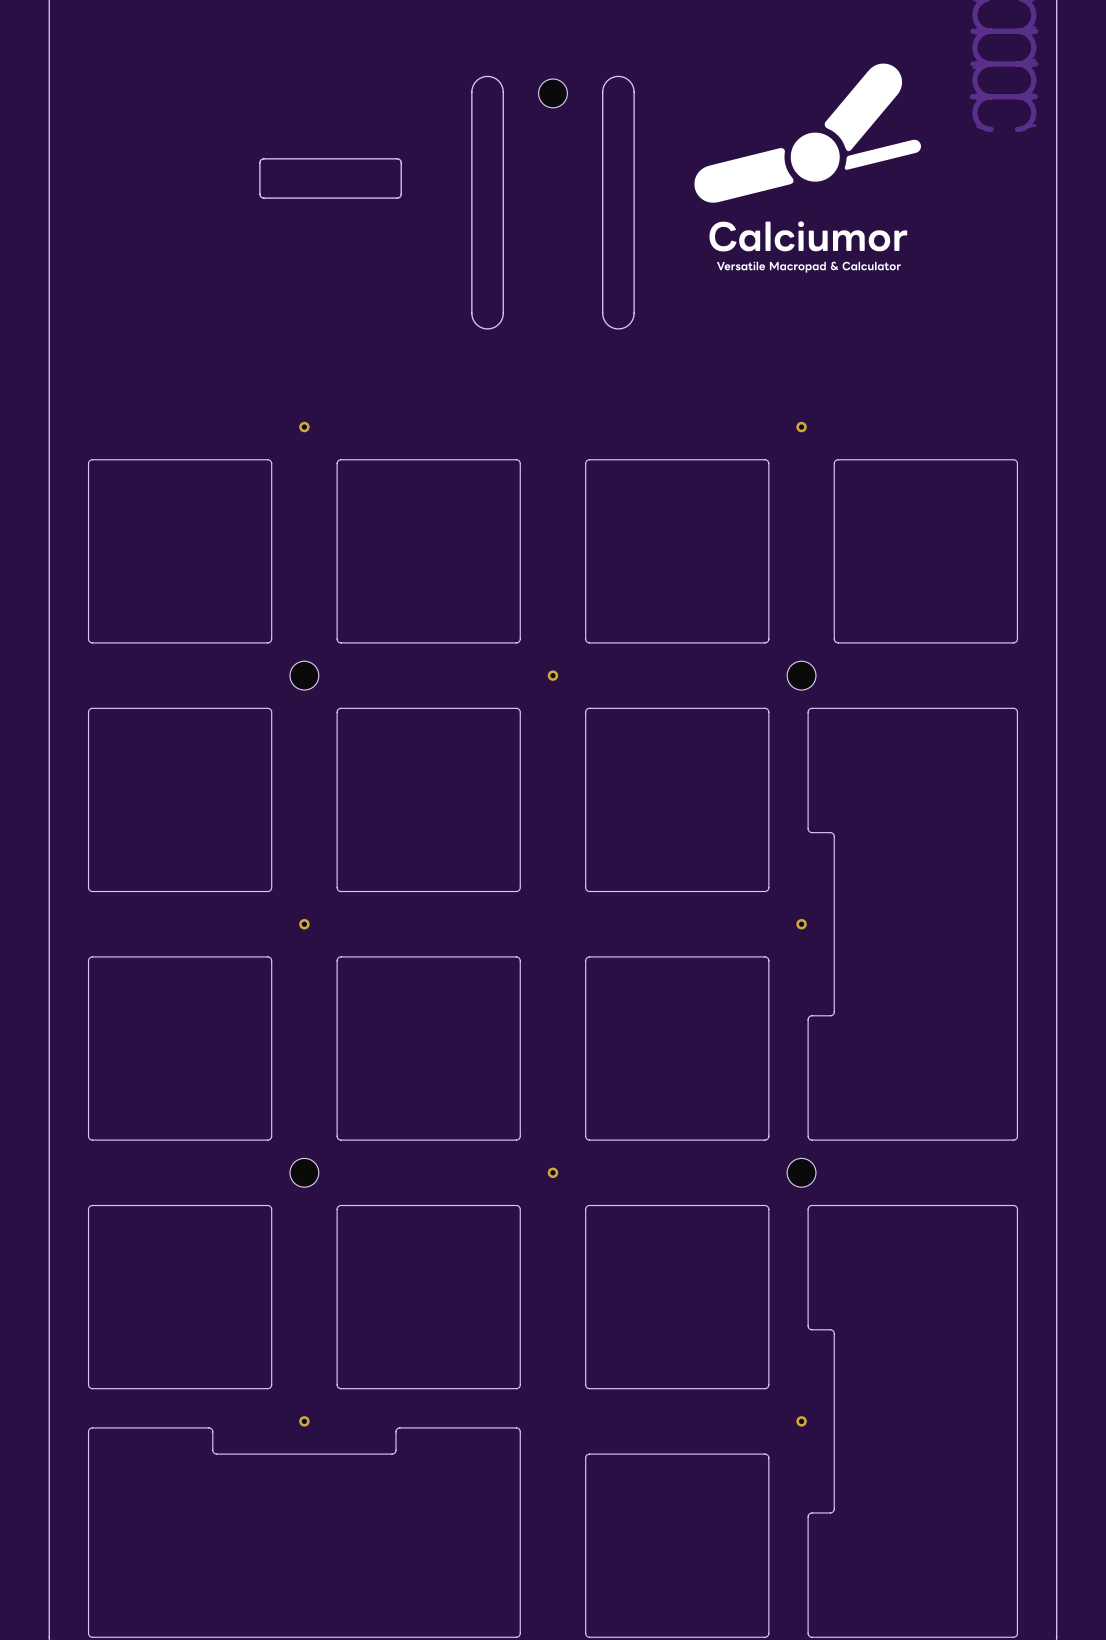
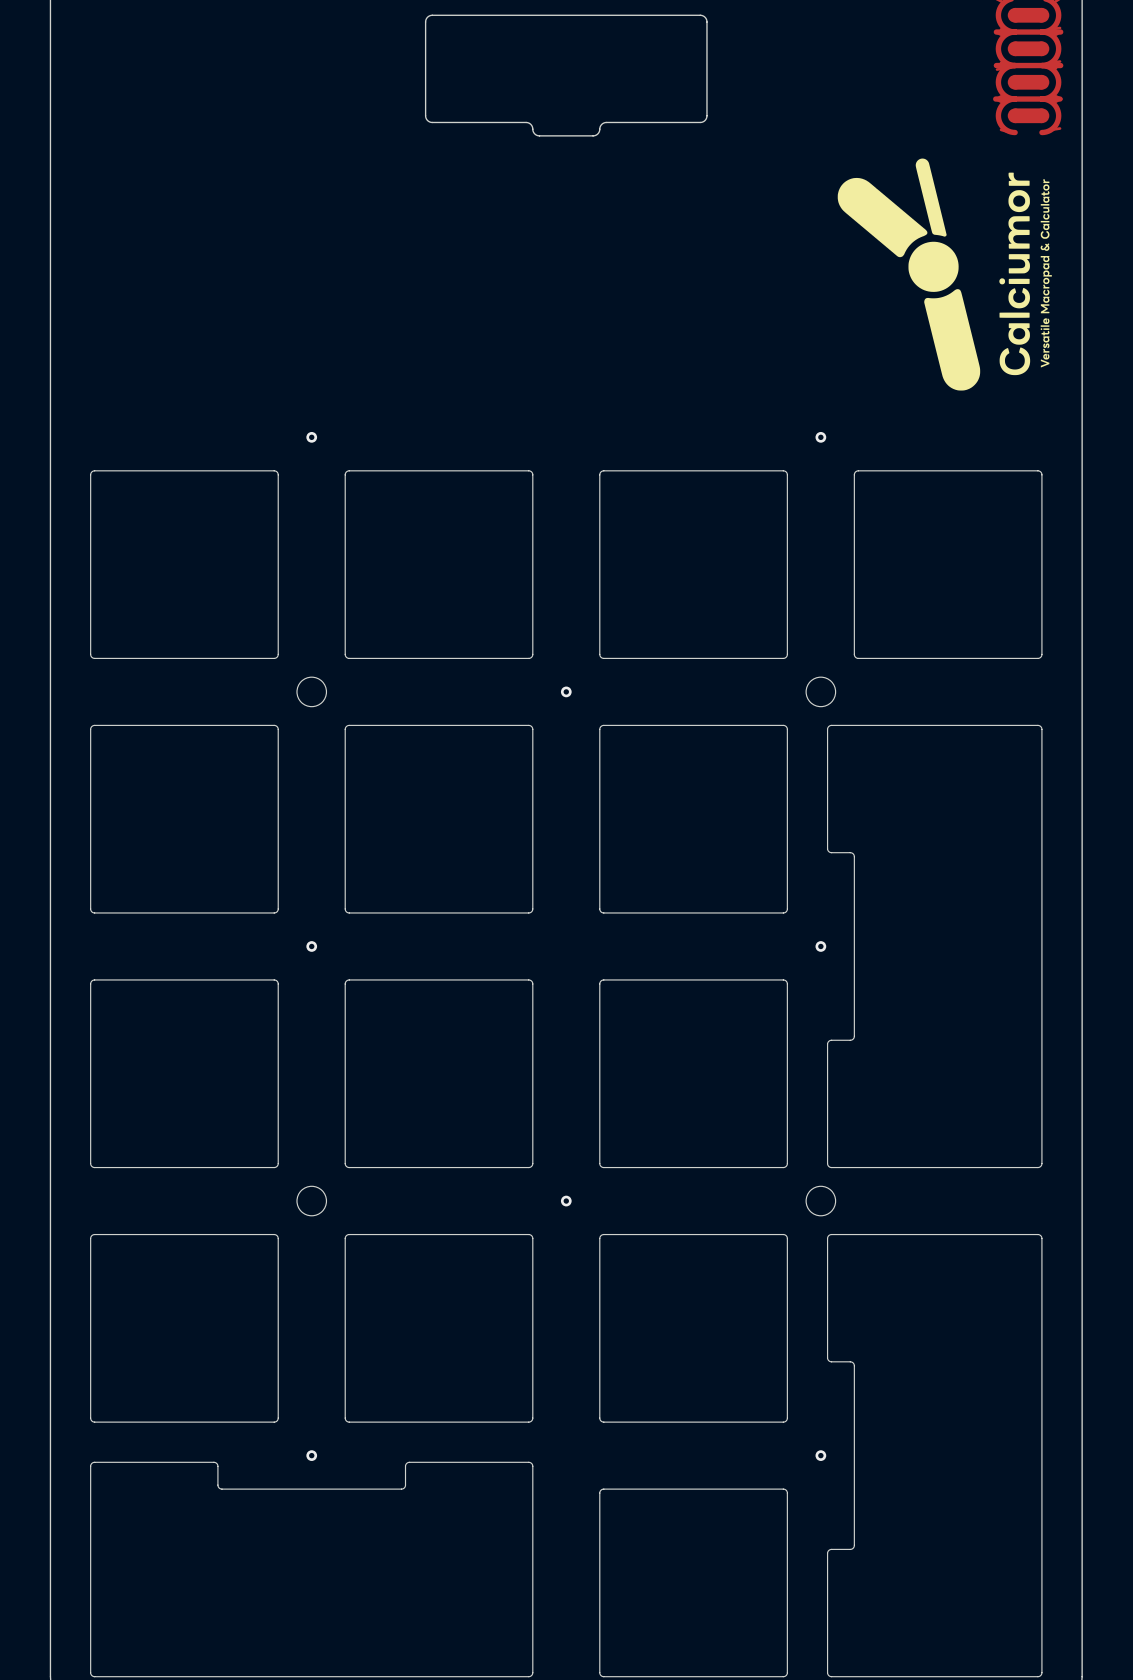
drawing: none -> [1007, 7, 1050, 23]
board edge: none -> (432, 15) (702, 15) (706, 21) (706, 118) (700, 122) (605, 122) (601, 125) (597, 133) (593, 135) (537, 135) (533, 132) (531, 125) (526, 122) (429, 121) (425, 115) (425, 21) (427, 17) (432, 15)
drawing: none -> [1007, 41, 1050, 57]
drawing: [694, 63, 921, 273] -> none
drawing: none -> [1007, 74, 1050, 90]
board edge: (471, 92) (471, 315) (478, 326) (489, 328) (499, 323) (503, 313) (503, 90) (496, 79) (485, 76) (475, 81) (471, 92) -> none
board edge: (602, 92) (602, 315) (609, 326) (620, 328) (630, 323) (634, 313) (633, 90) (627, 79) (618, 76) (607, 81) (602, 92) -> none
part: (552, 93) -> none
drawing: none -> [1007, 108, 1050, 124]
drawing: none -> [837, 158, 1052, 391]
board edge: (263, 158) (398, 158) (401, 162) (401, 195) (397, 198) (262, 197) (259, 194) (259, 162) (263, 158) -> none

